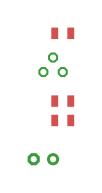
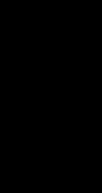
part: (62, 33) -> none
part: (53, 64) -> none
part: (62, 101) -> none
part: (62, 120) -> none
part: (43, 159) -> none

